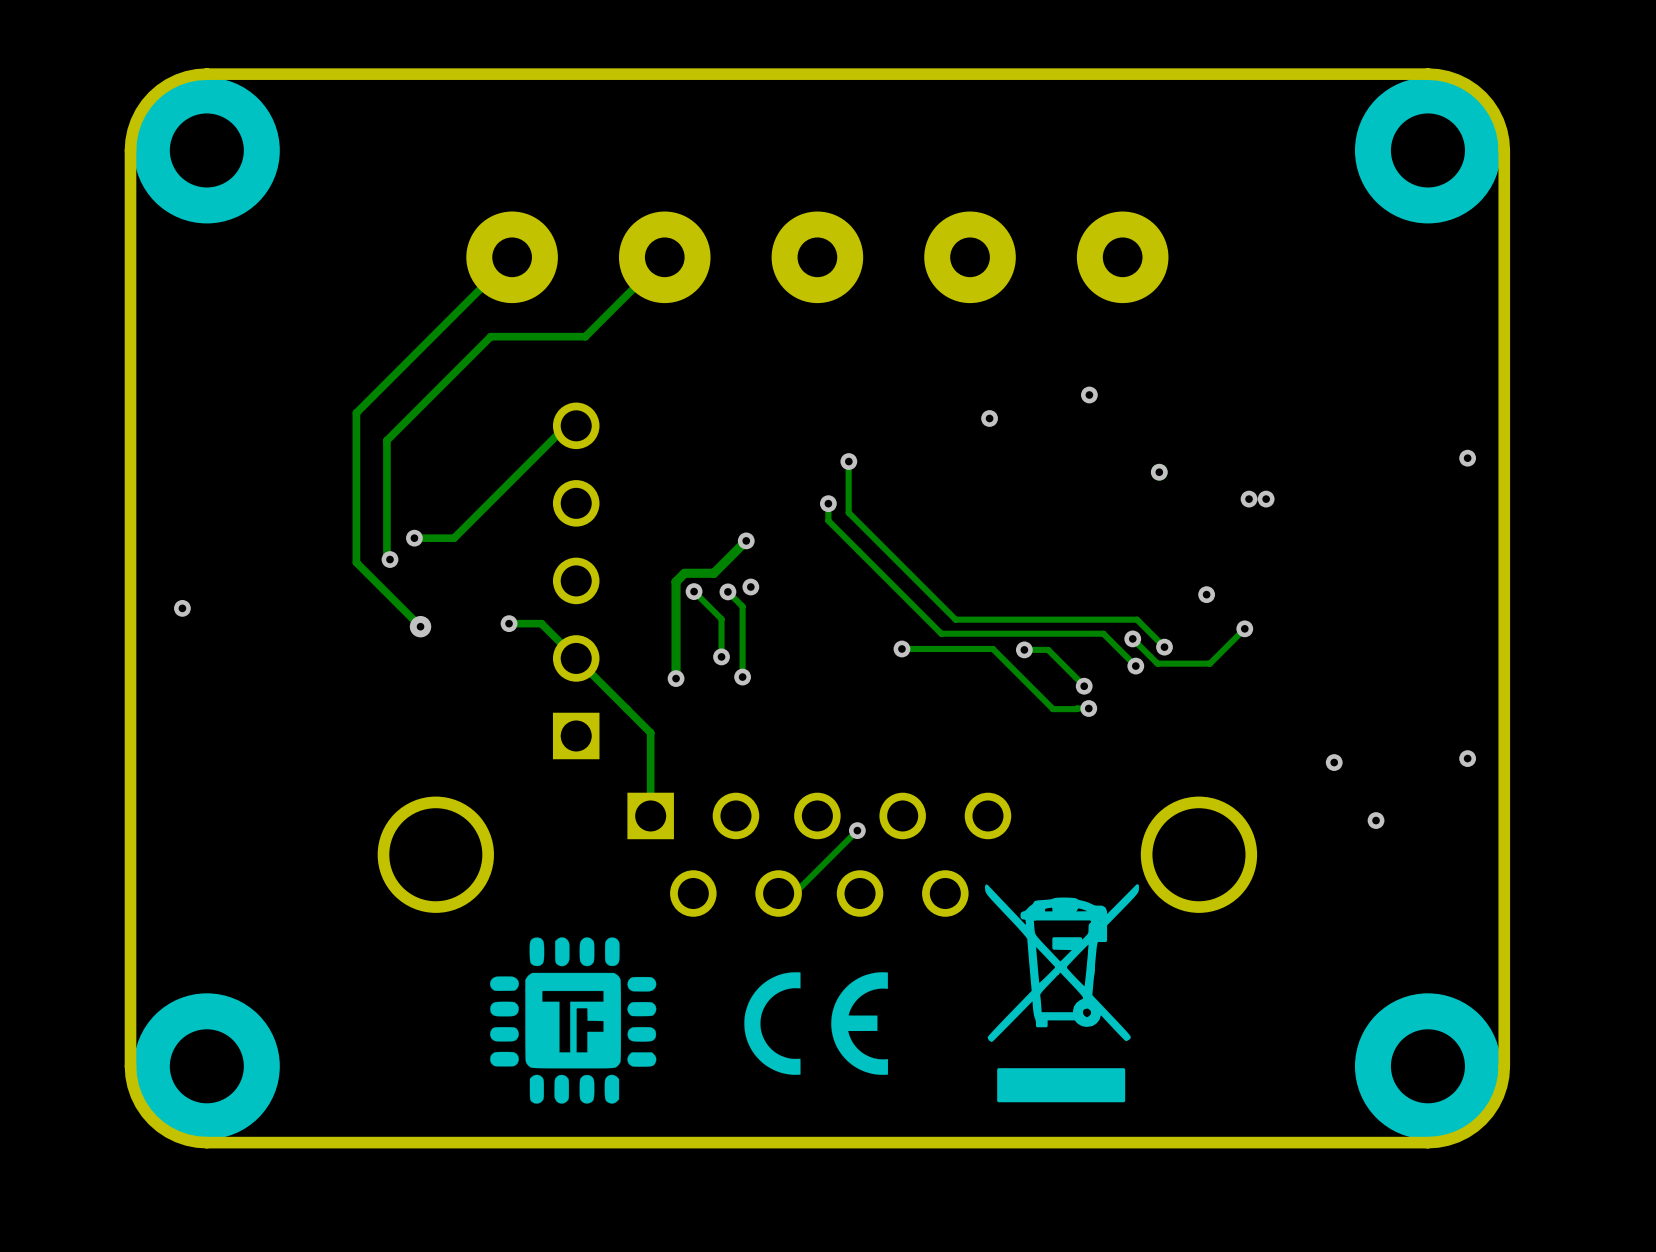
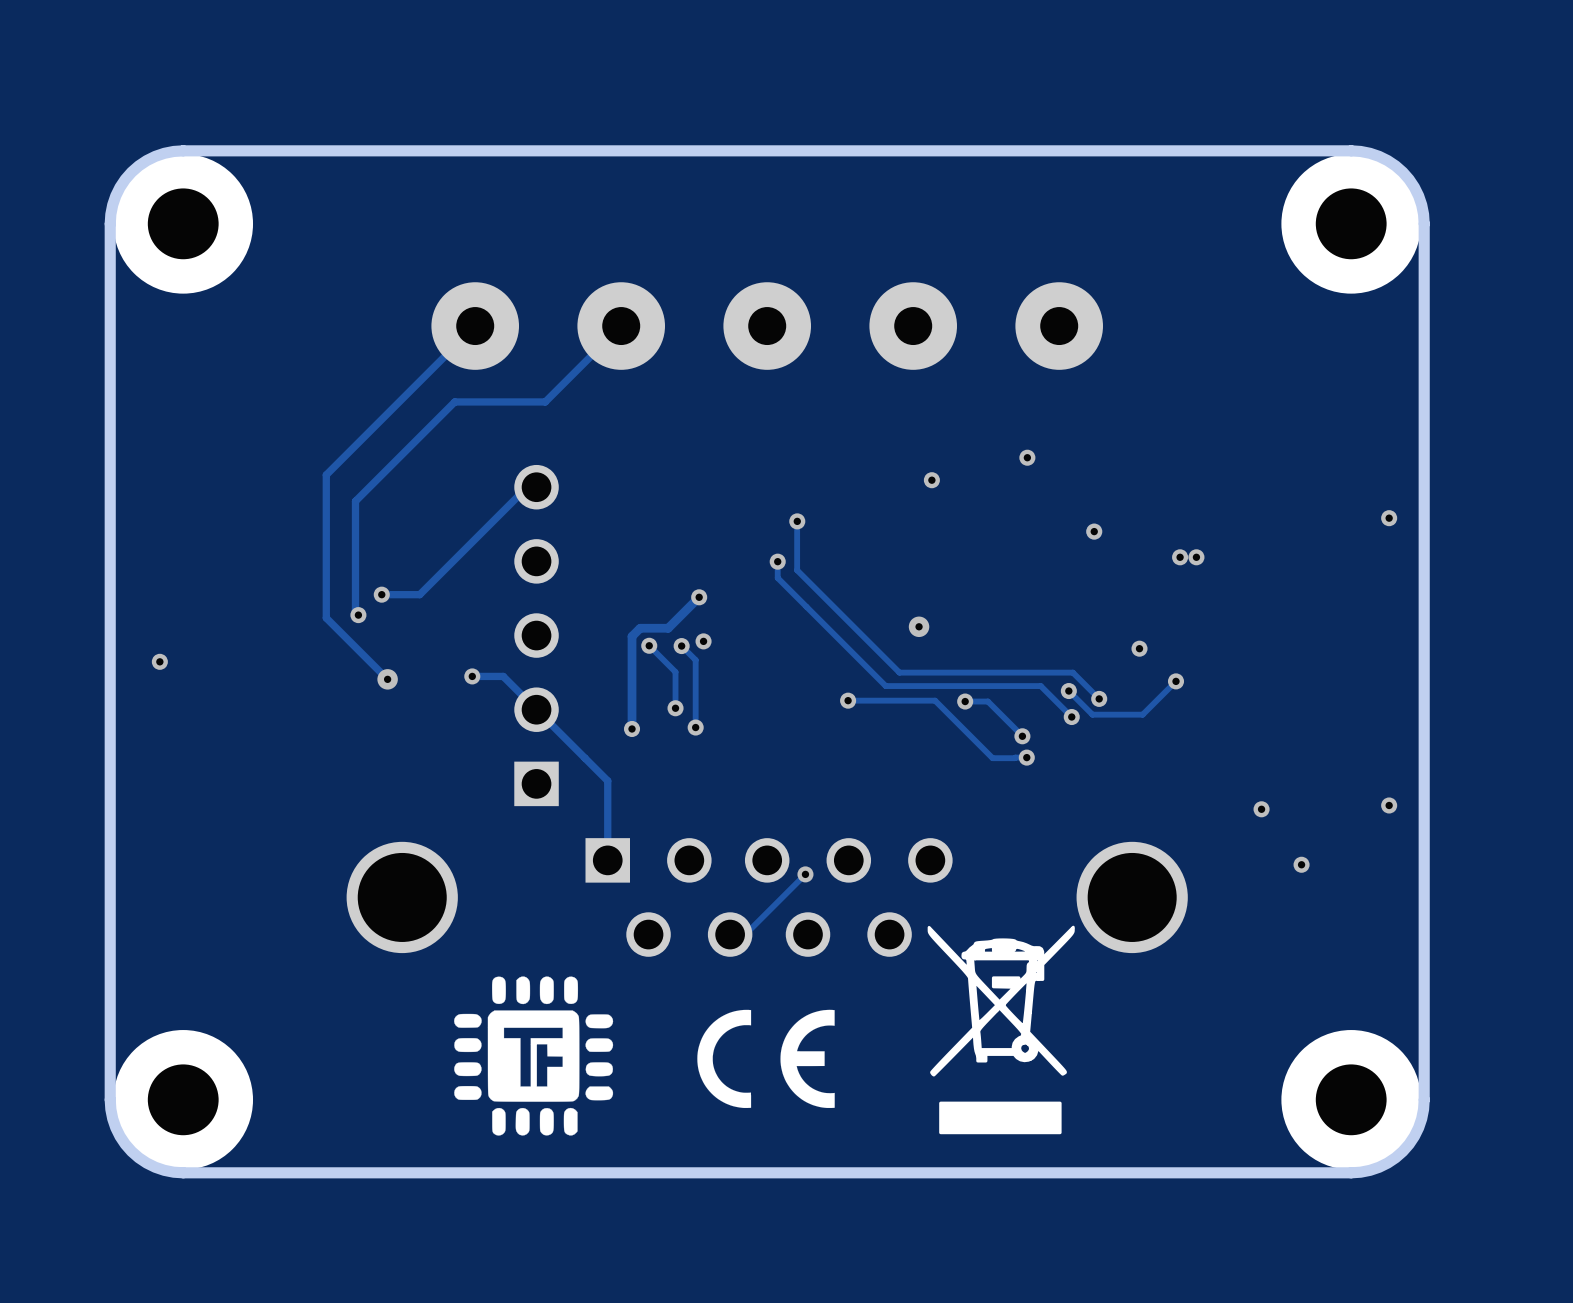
via: none -> (919, 626)

